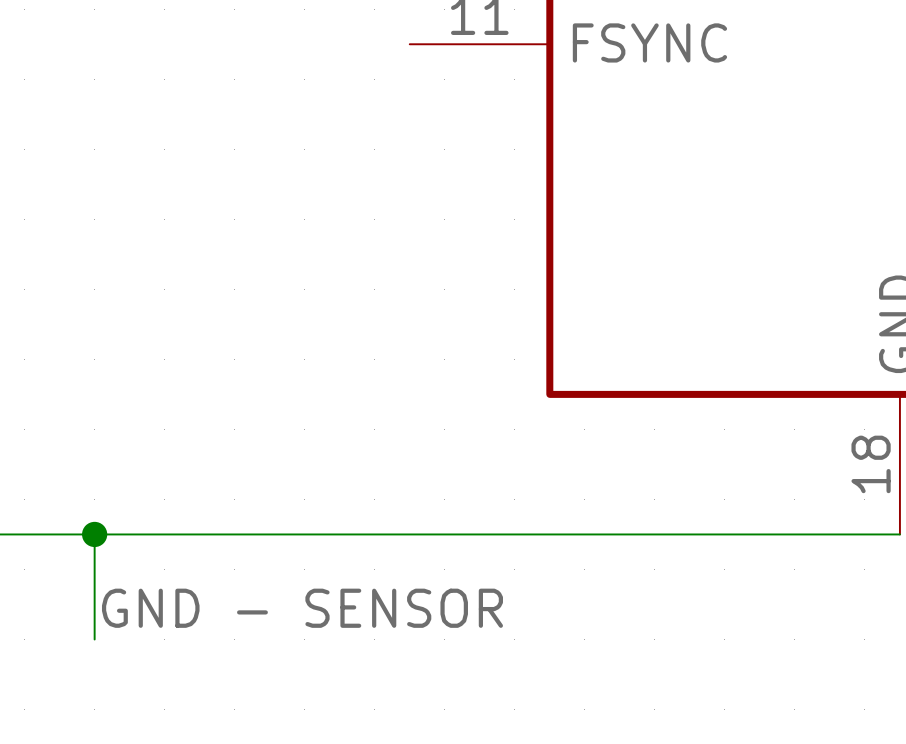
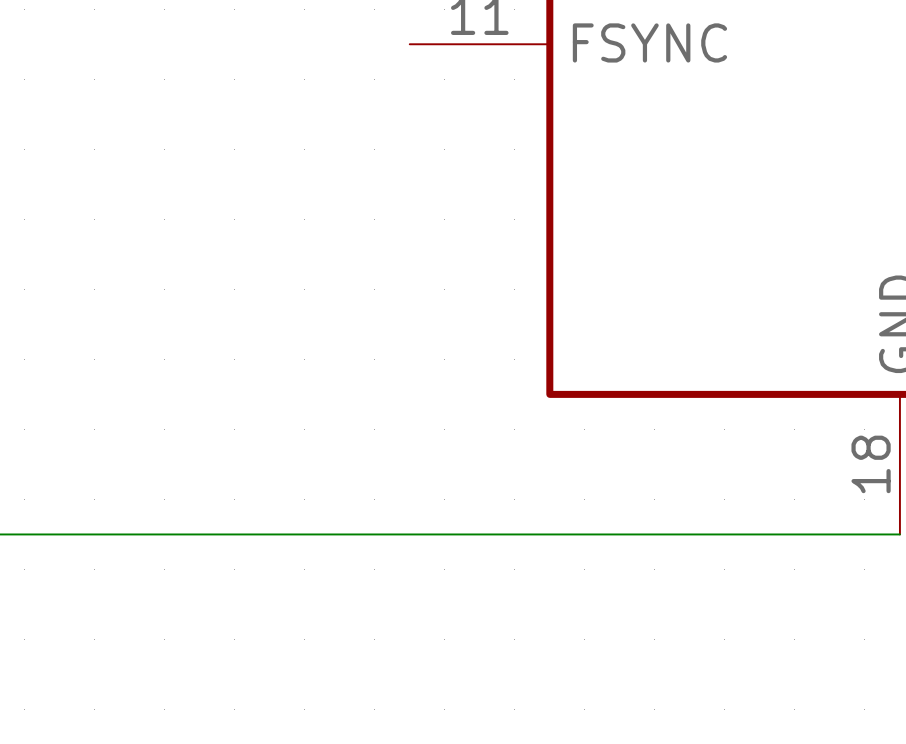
wire: (94, 534) (94, 639) -> none
junction: (94, 534) -> none
label: GND - SENSOR (302, 608) -> none

